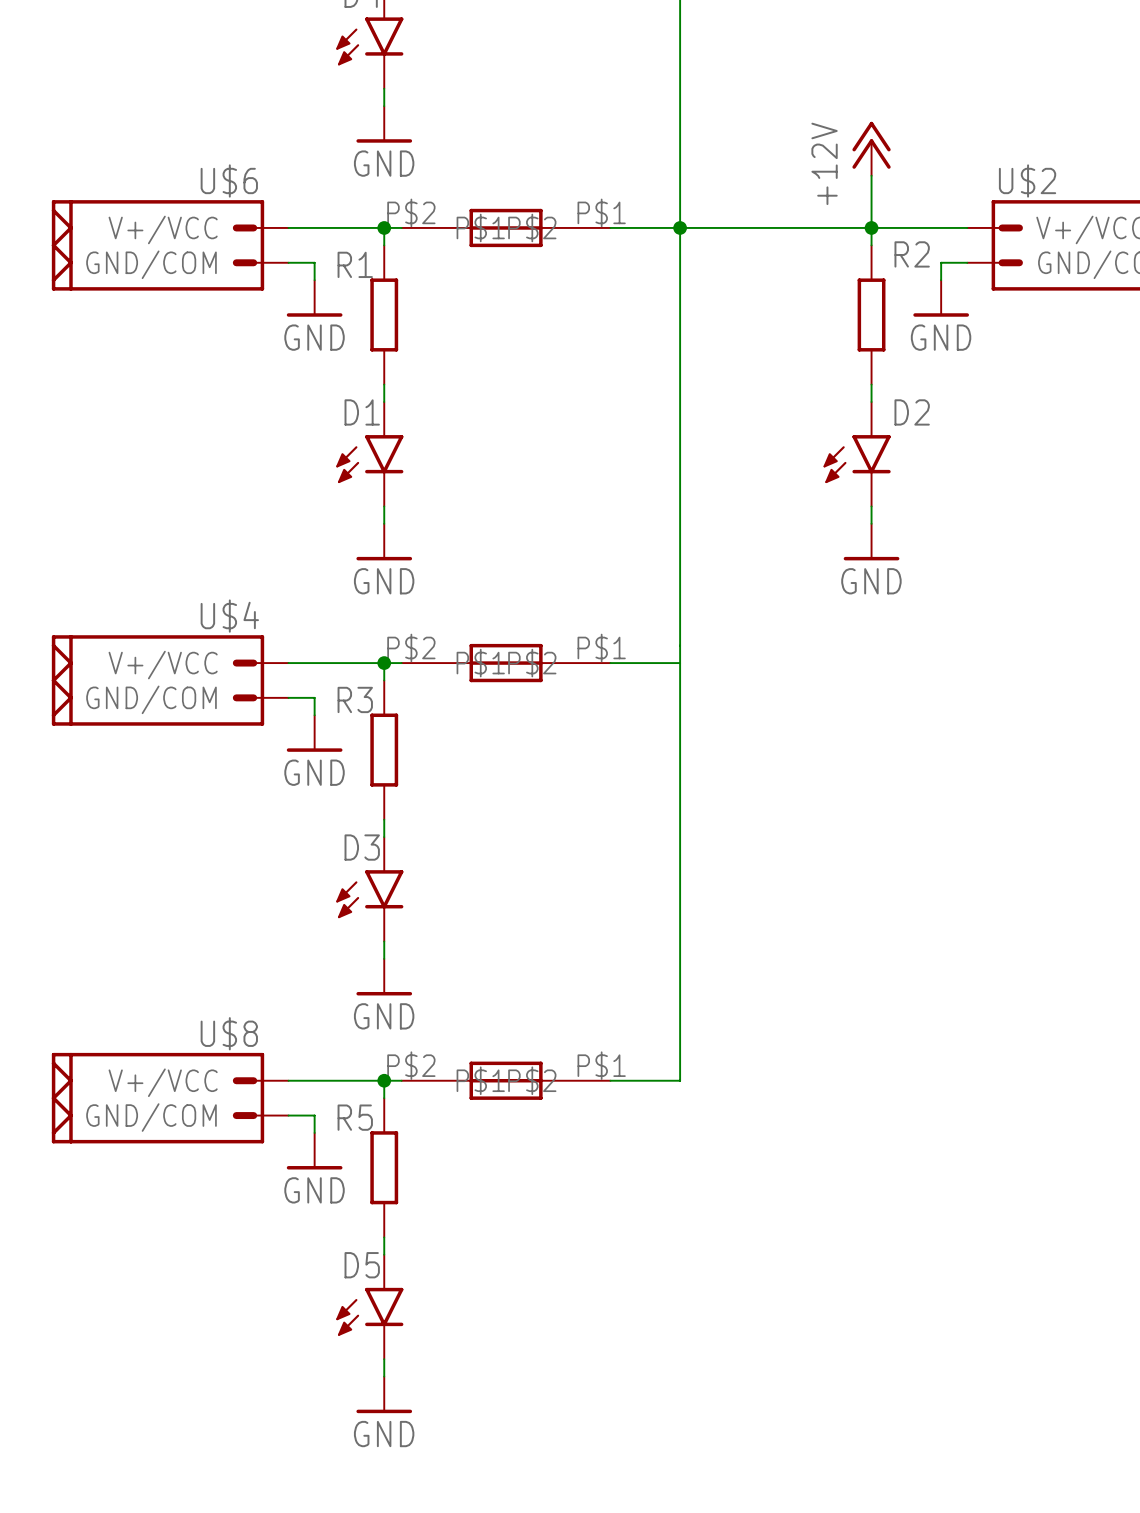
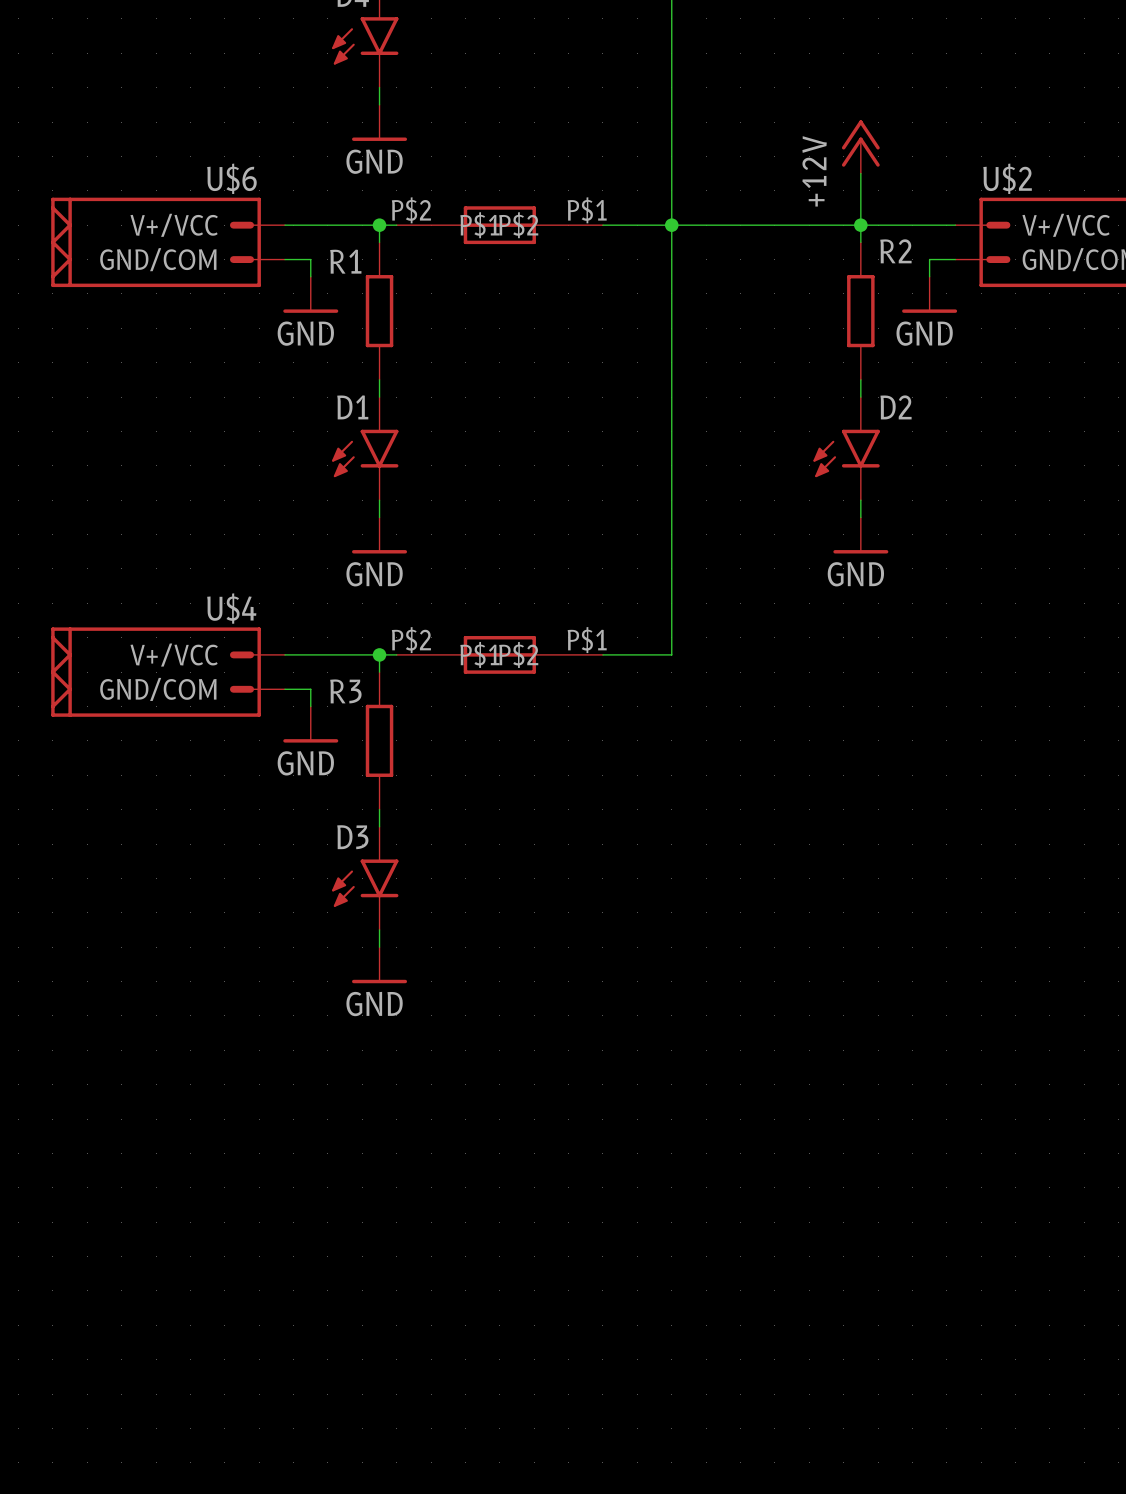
wire: (680, 663) (680, 1080) (610, 1080) -> none
wire: (288, 1080) (401, 1080) -> none
wire: (384, 1080) (384, 1098) -> none
junction: (384, 1080) -> none
part: (506, 1080) -> none
U$8: (170, 1098) -> none
wire: (288, 1115) (314, 1115) (314, 1132) -> none
power symbol: GND (314, 1151) -> none
R5: (384, 1167) -> none
wire: (384, 1237) (384, 1254) -> none
D5: (369, 1306) -> none
wire: (384, 1359) (384, 1376) -> none
power symbol: GND (384, 1394) -> none

